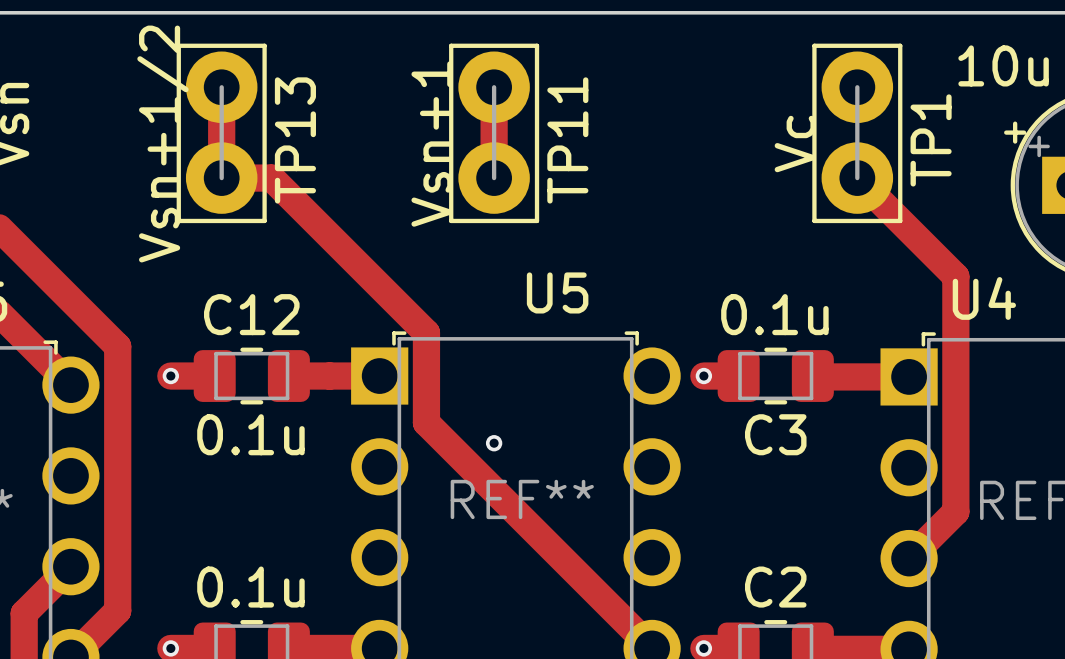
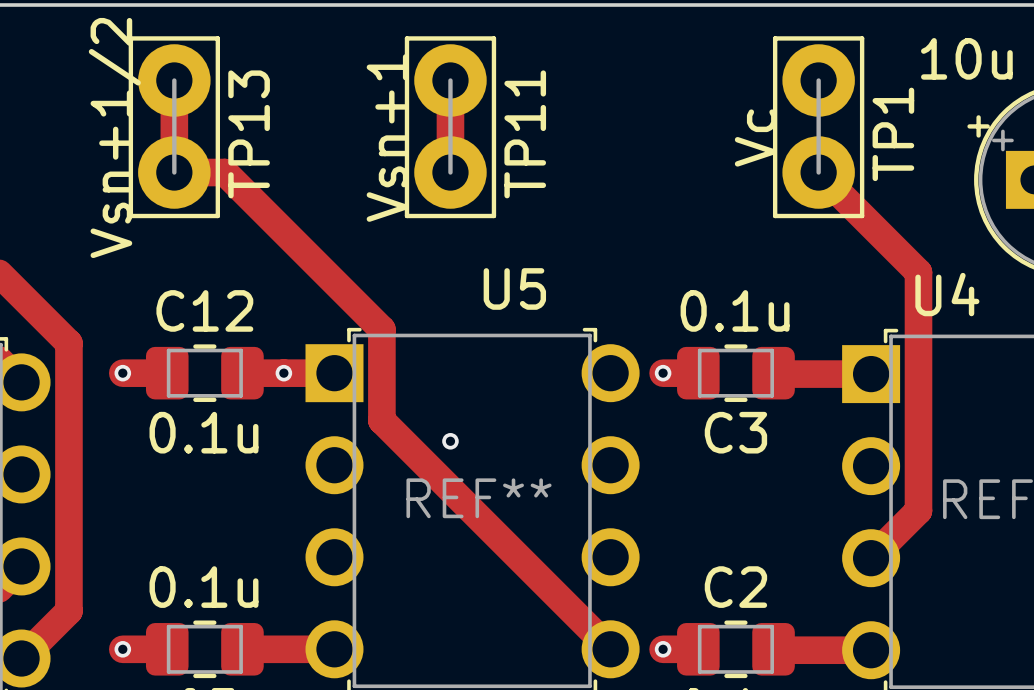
via: none -> (283, 373)

